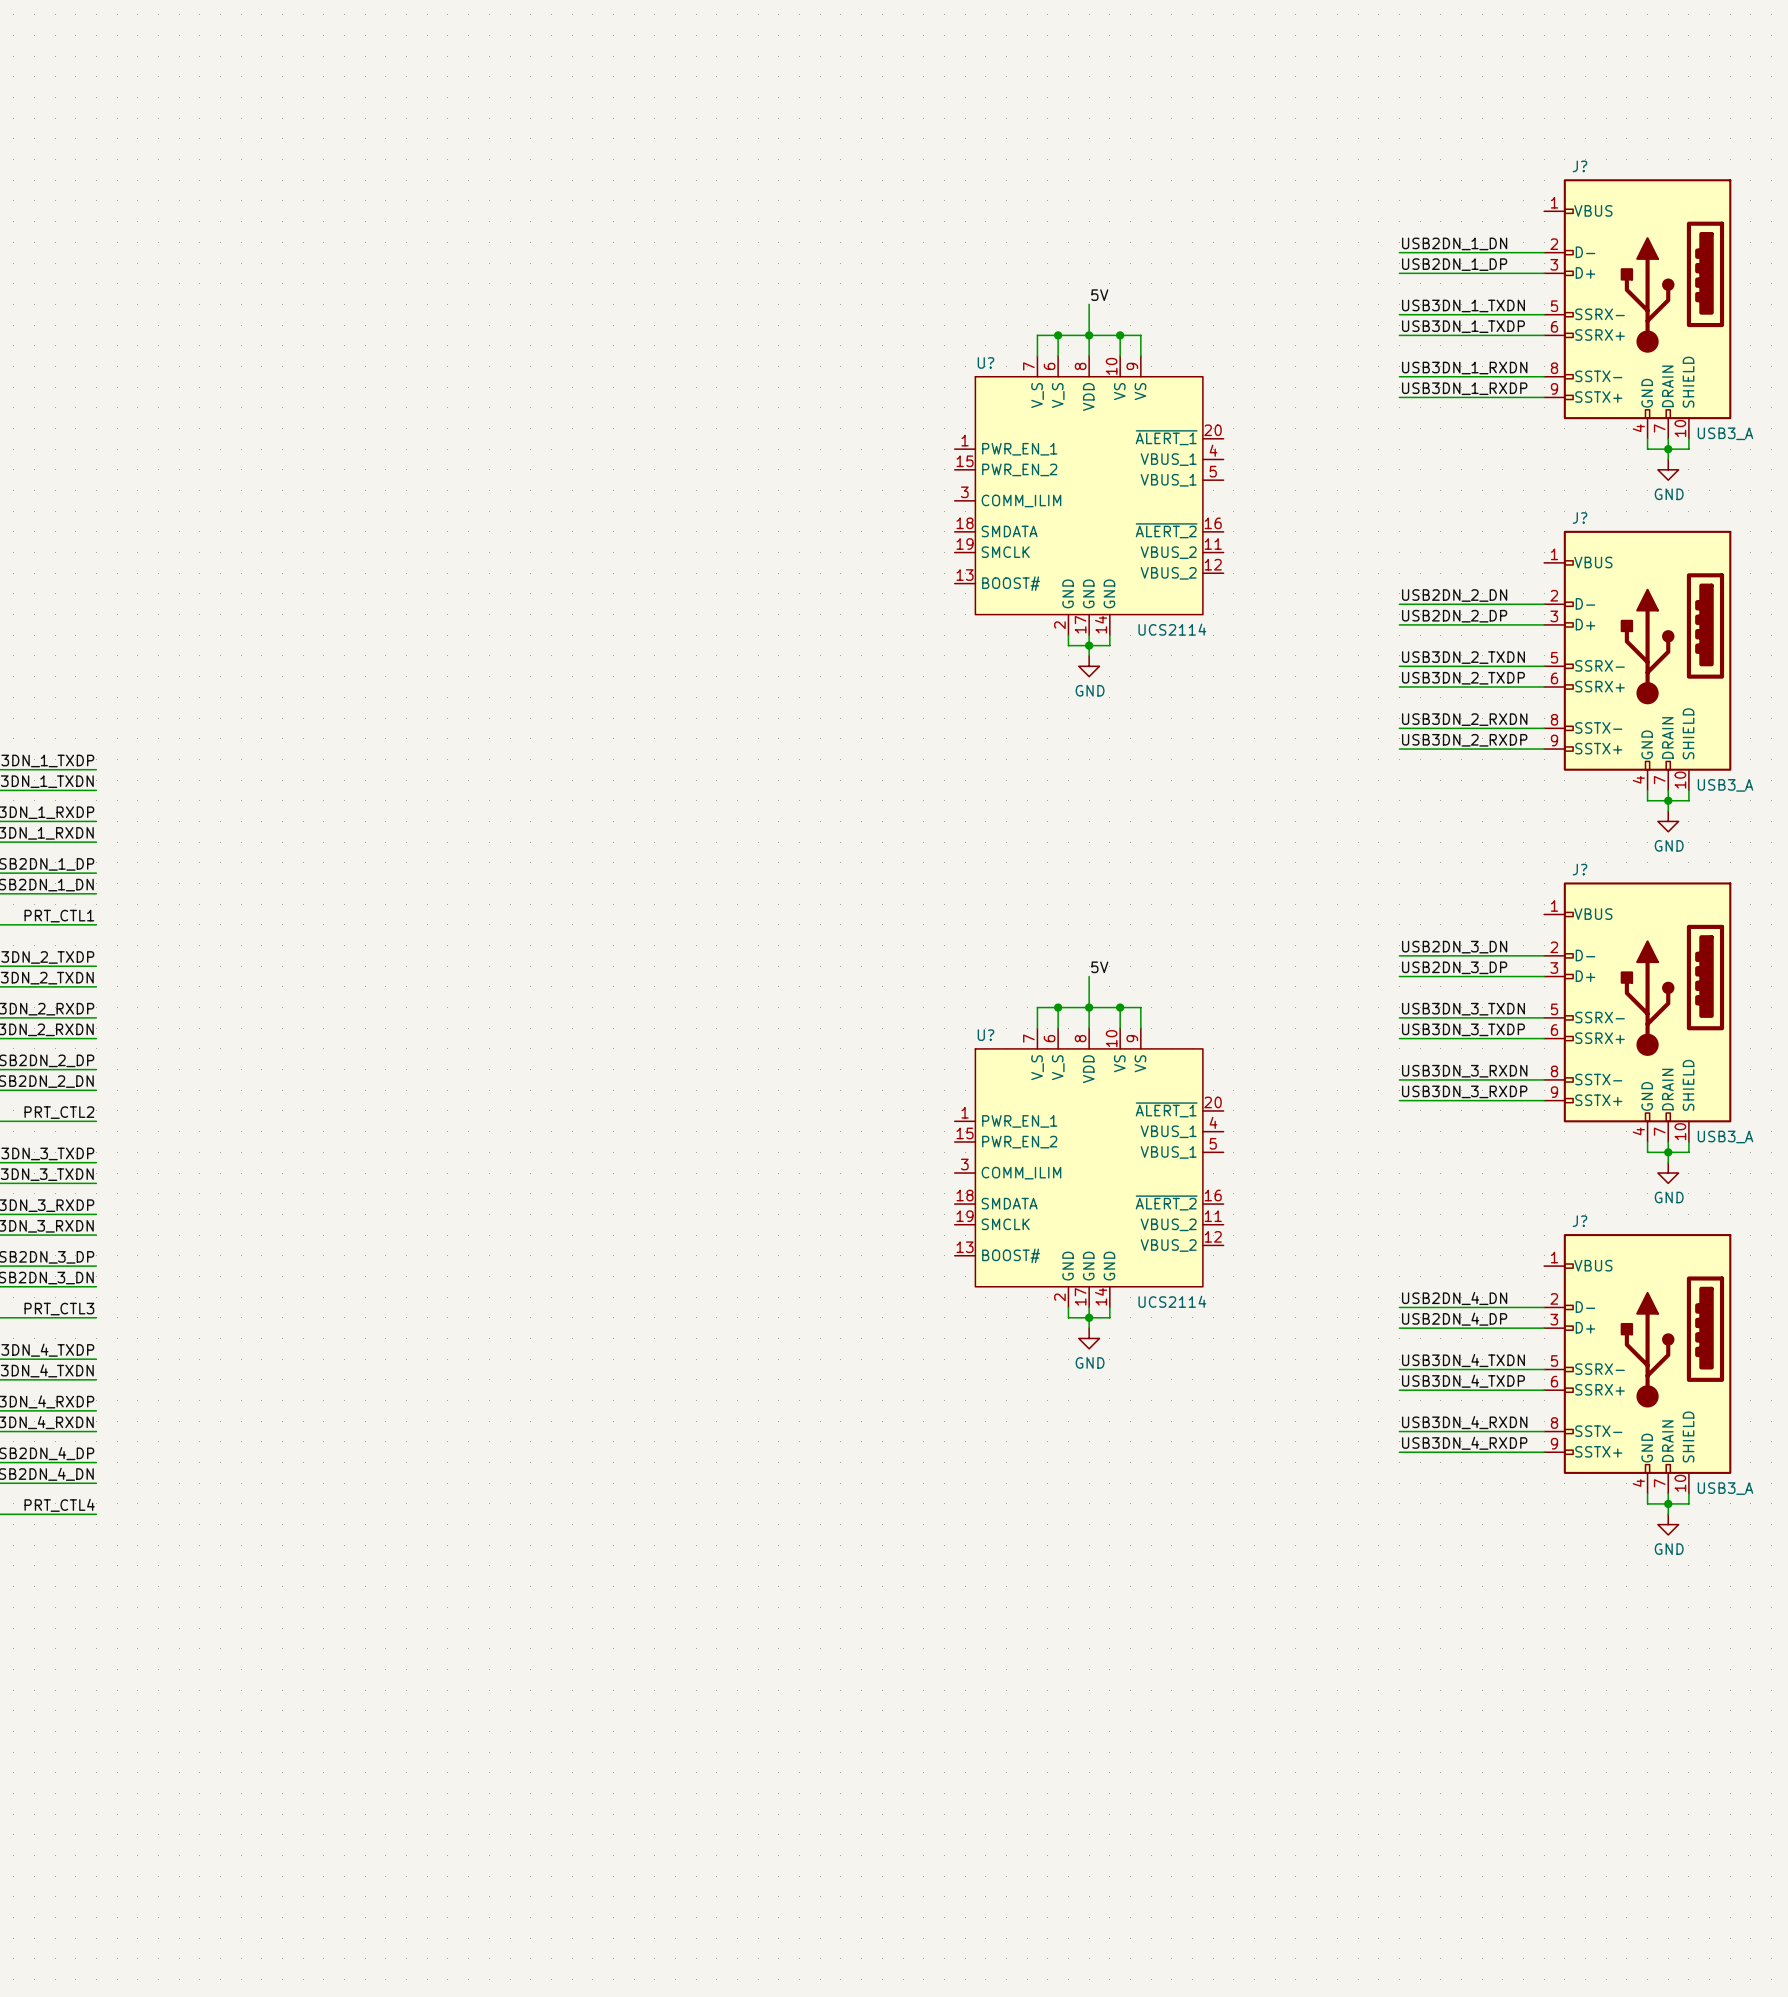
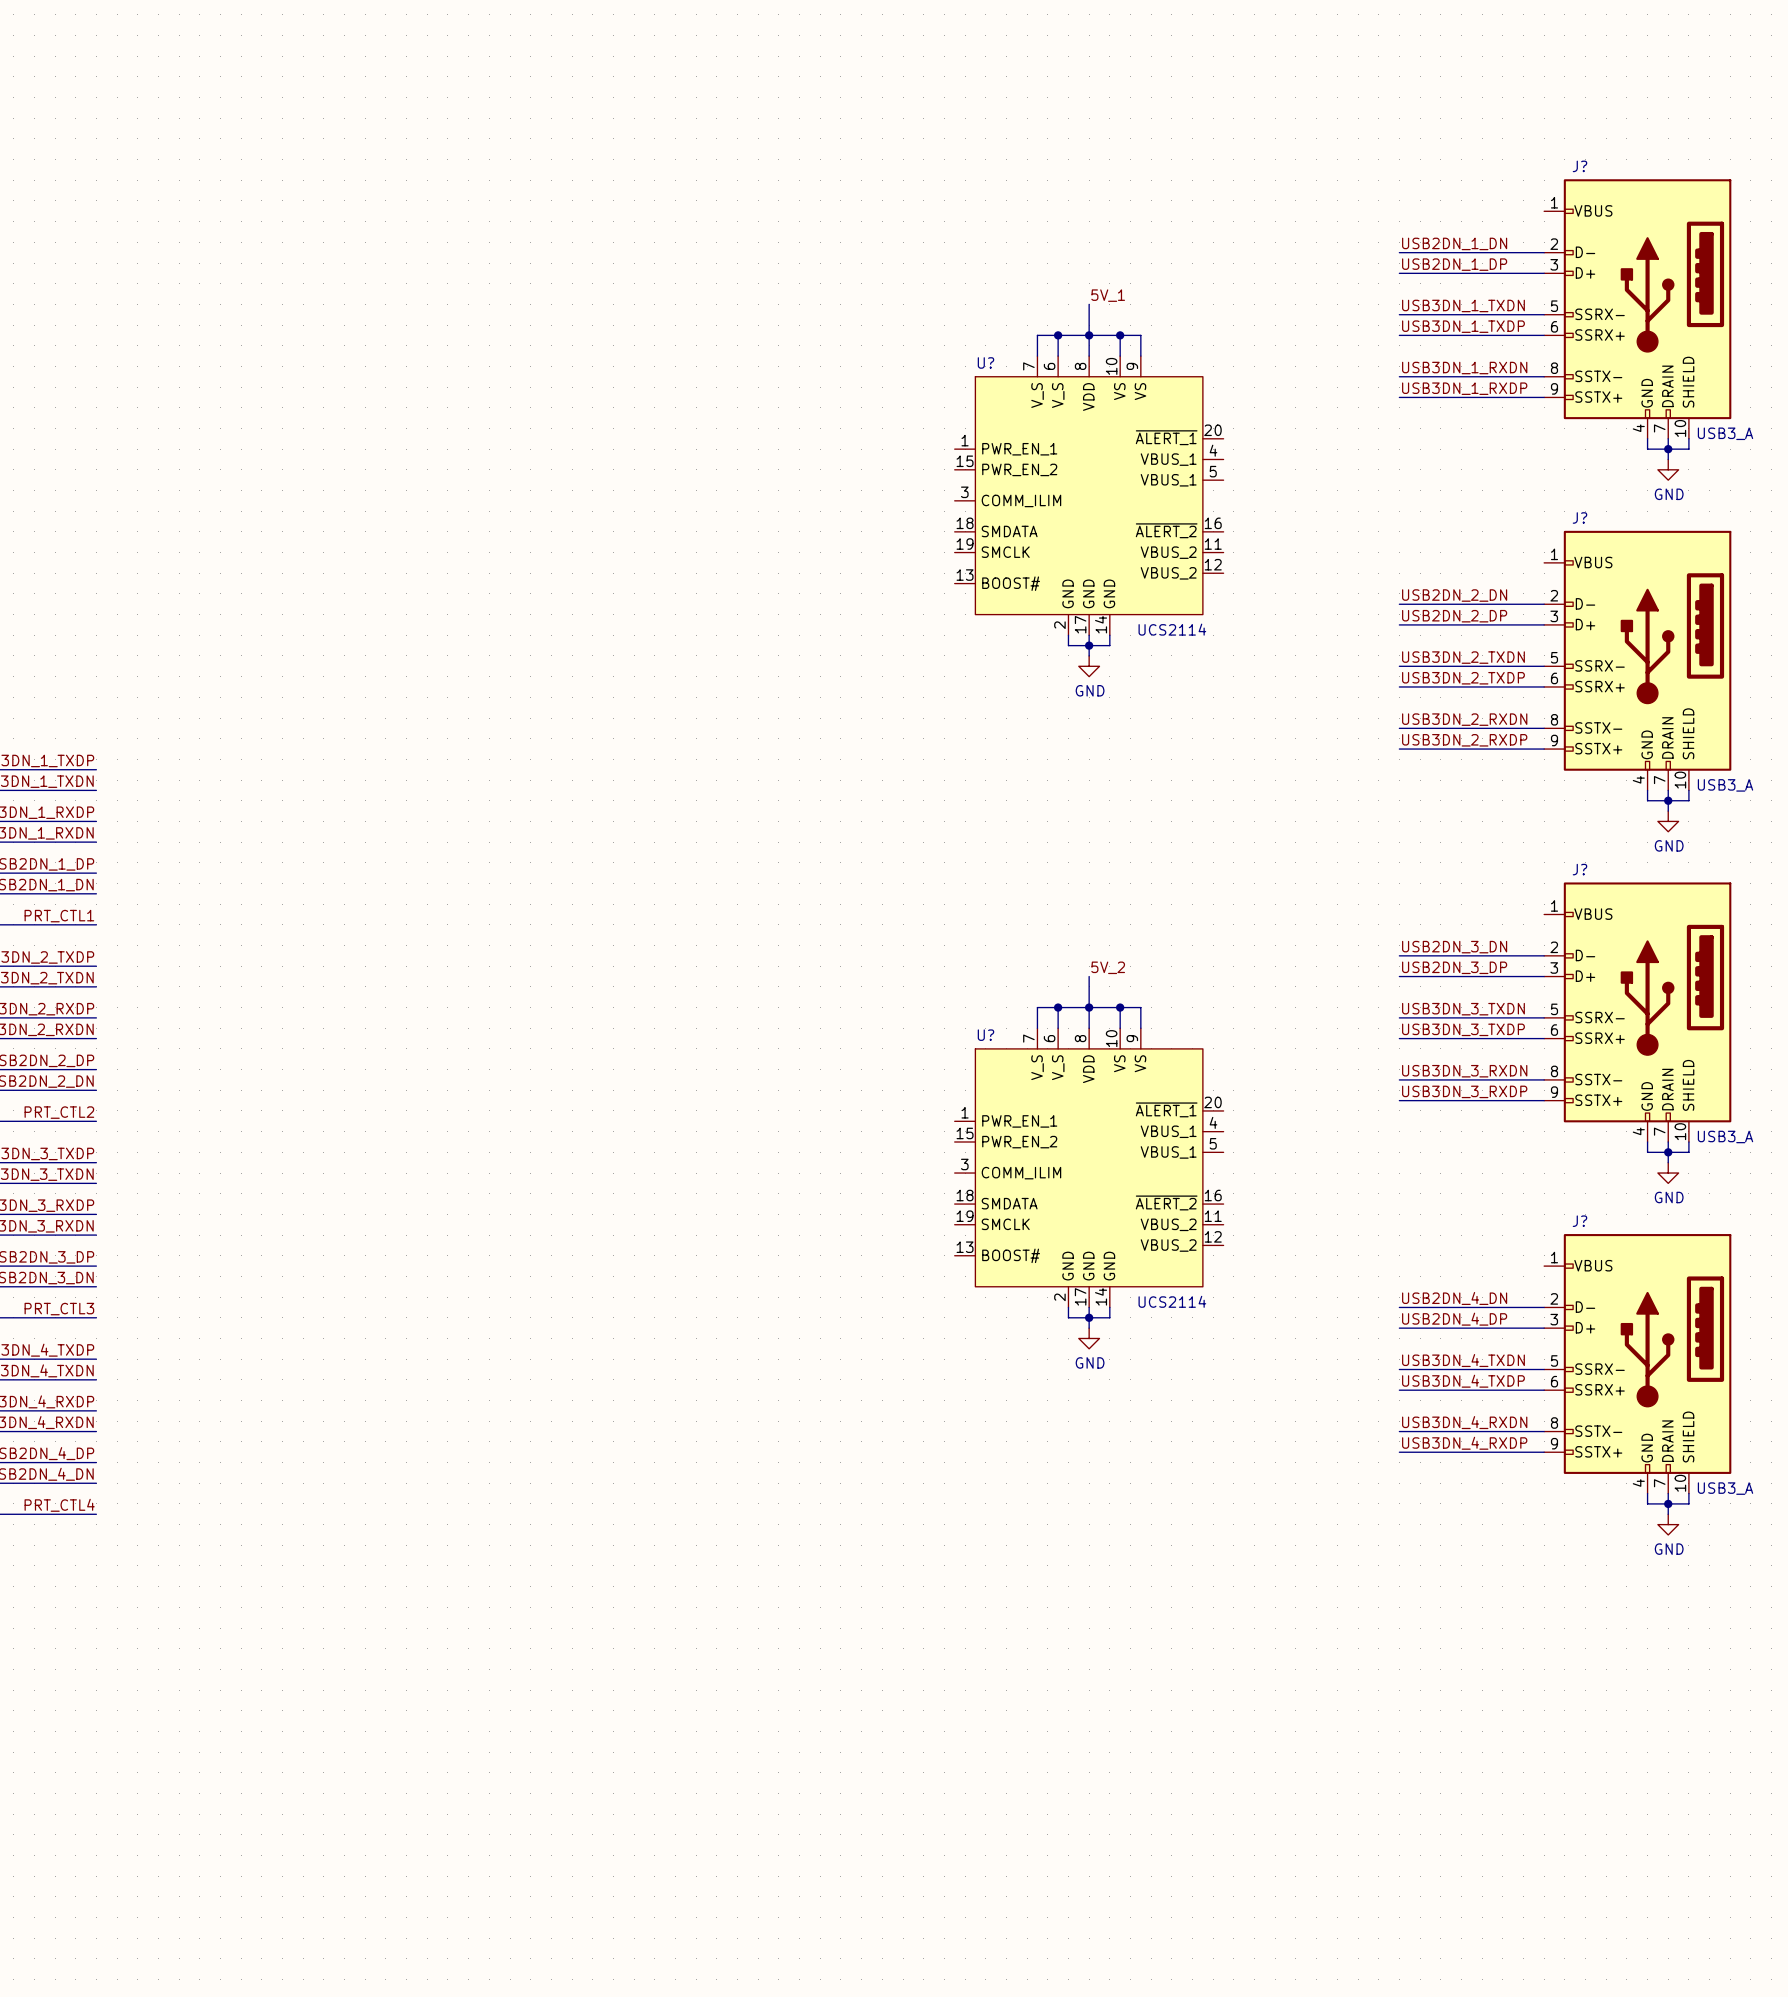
label: 5V (1099, 295) -> 5V_1 (1108, 295)
label: 5V (1099, 967) -> 5V_2 (1108, 967)

